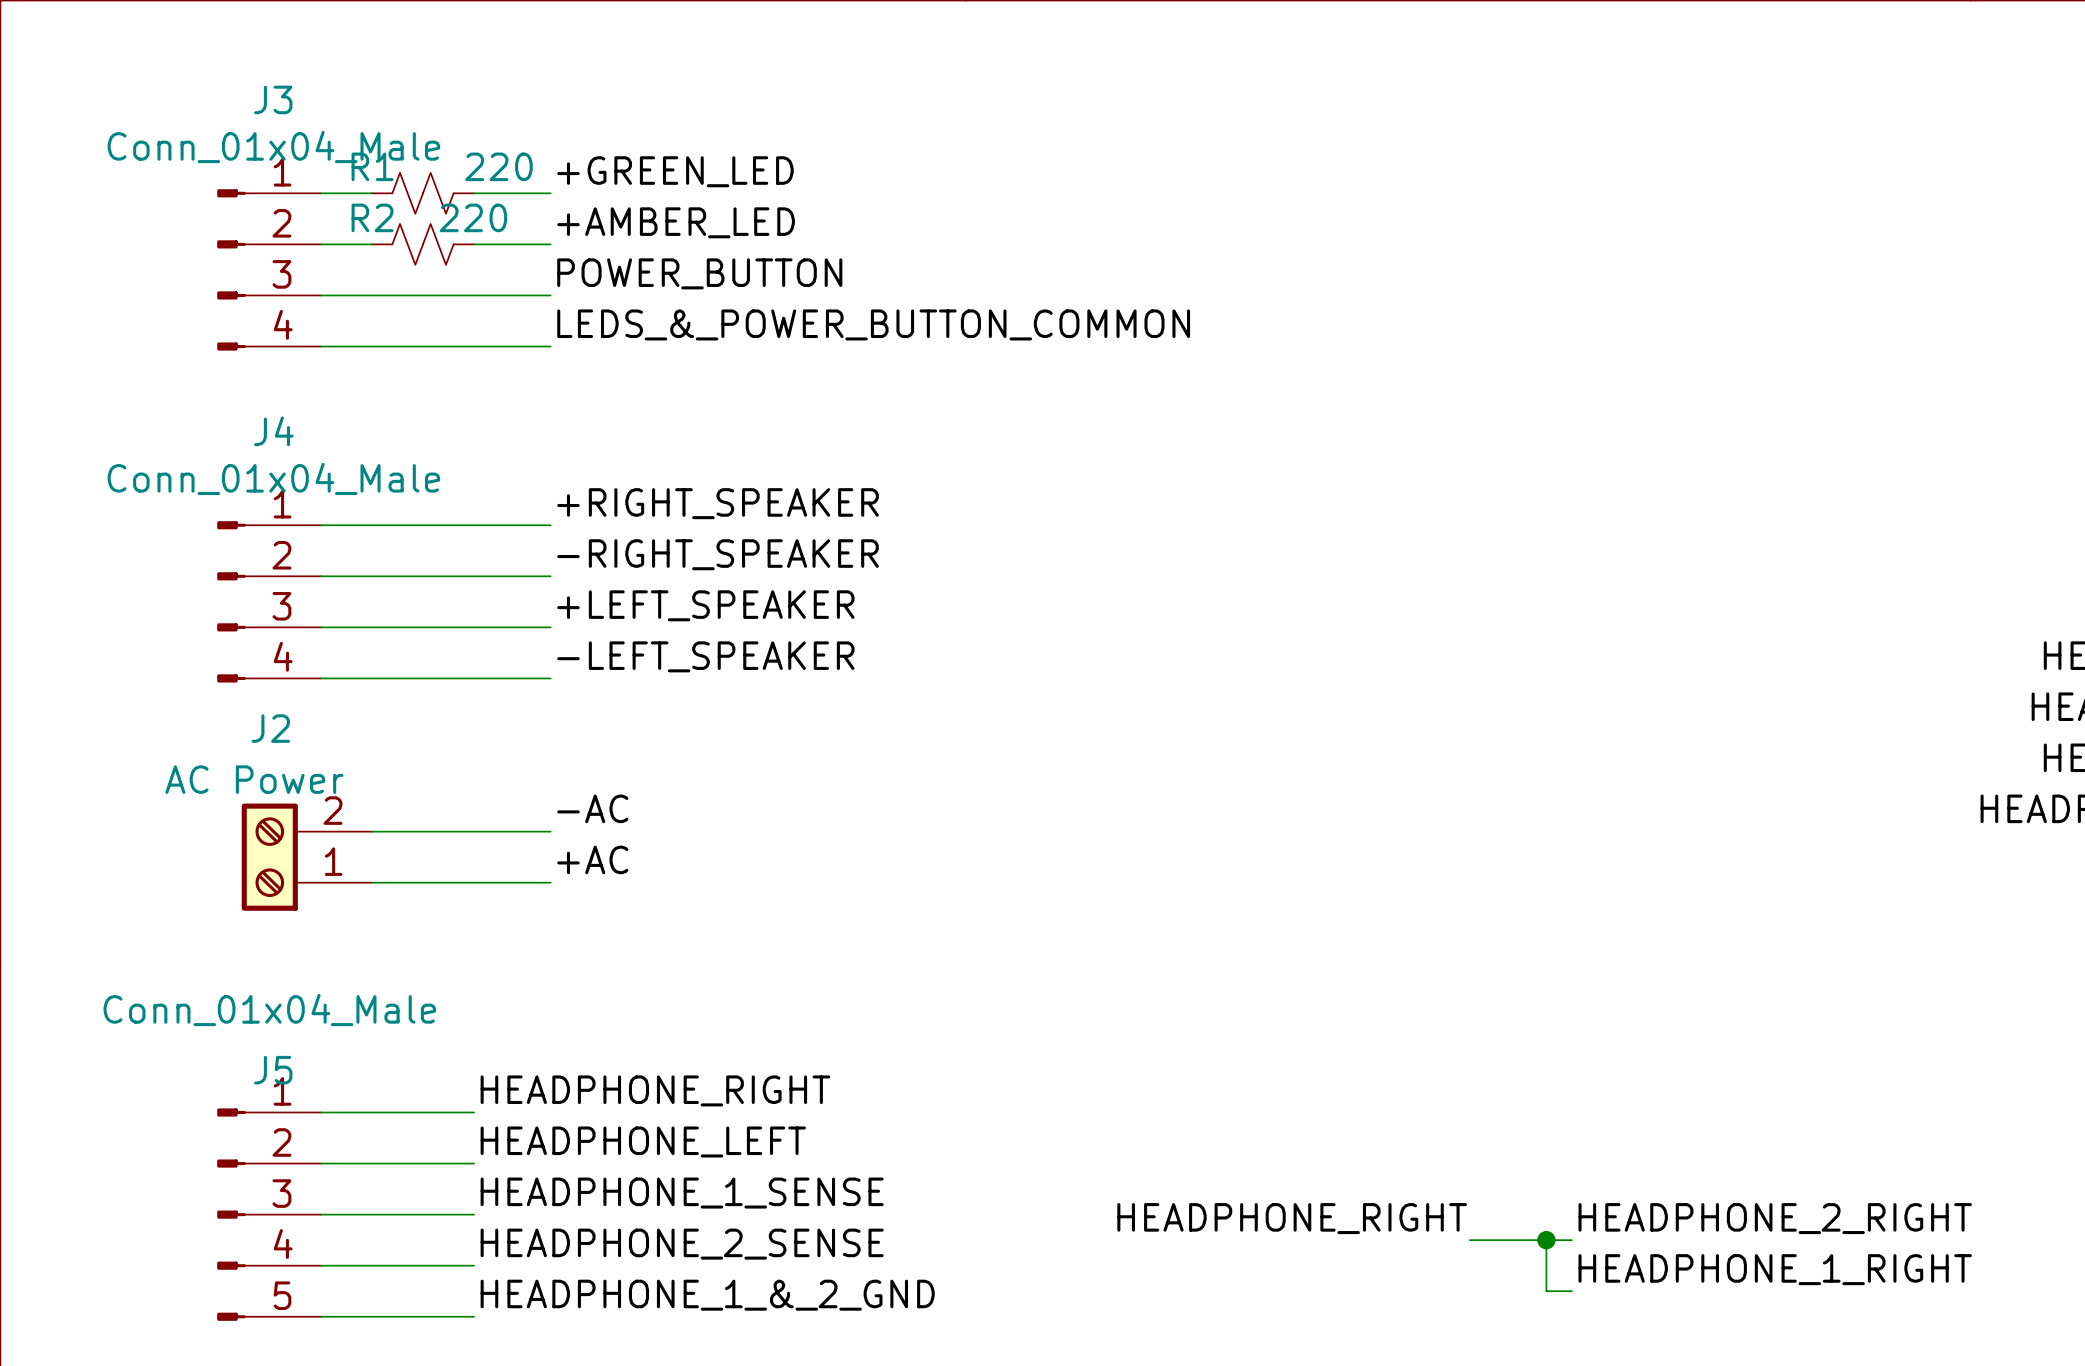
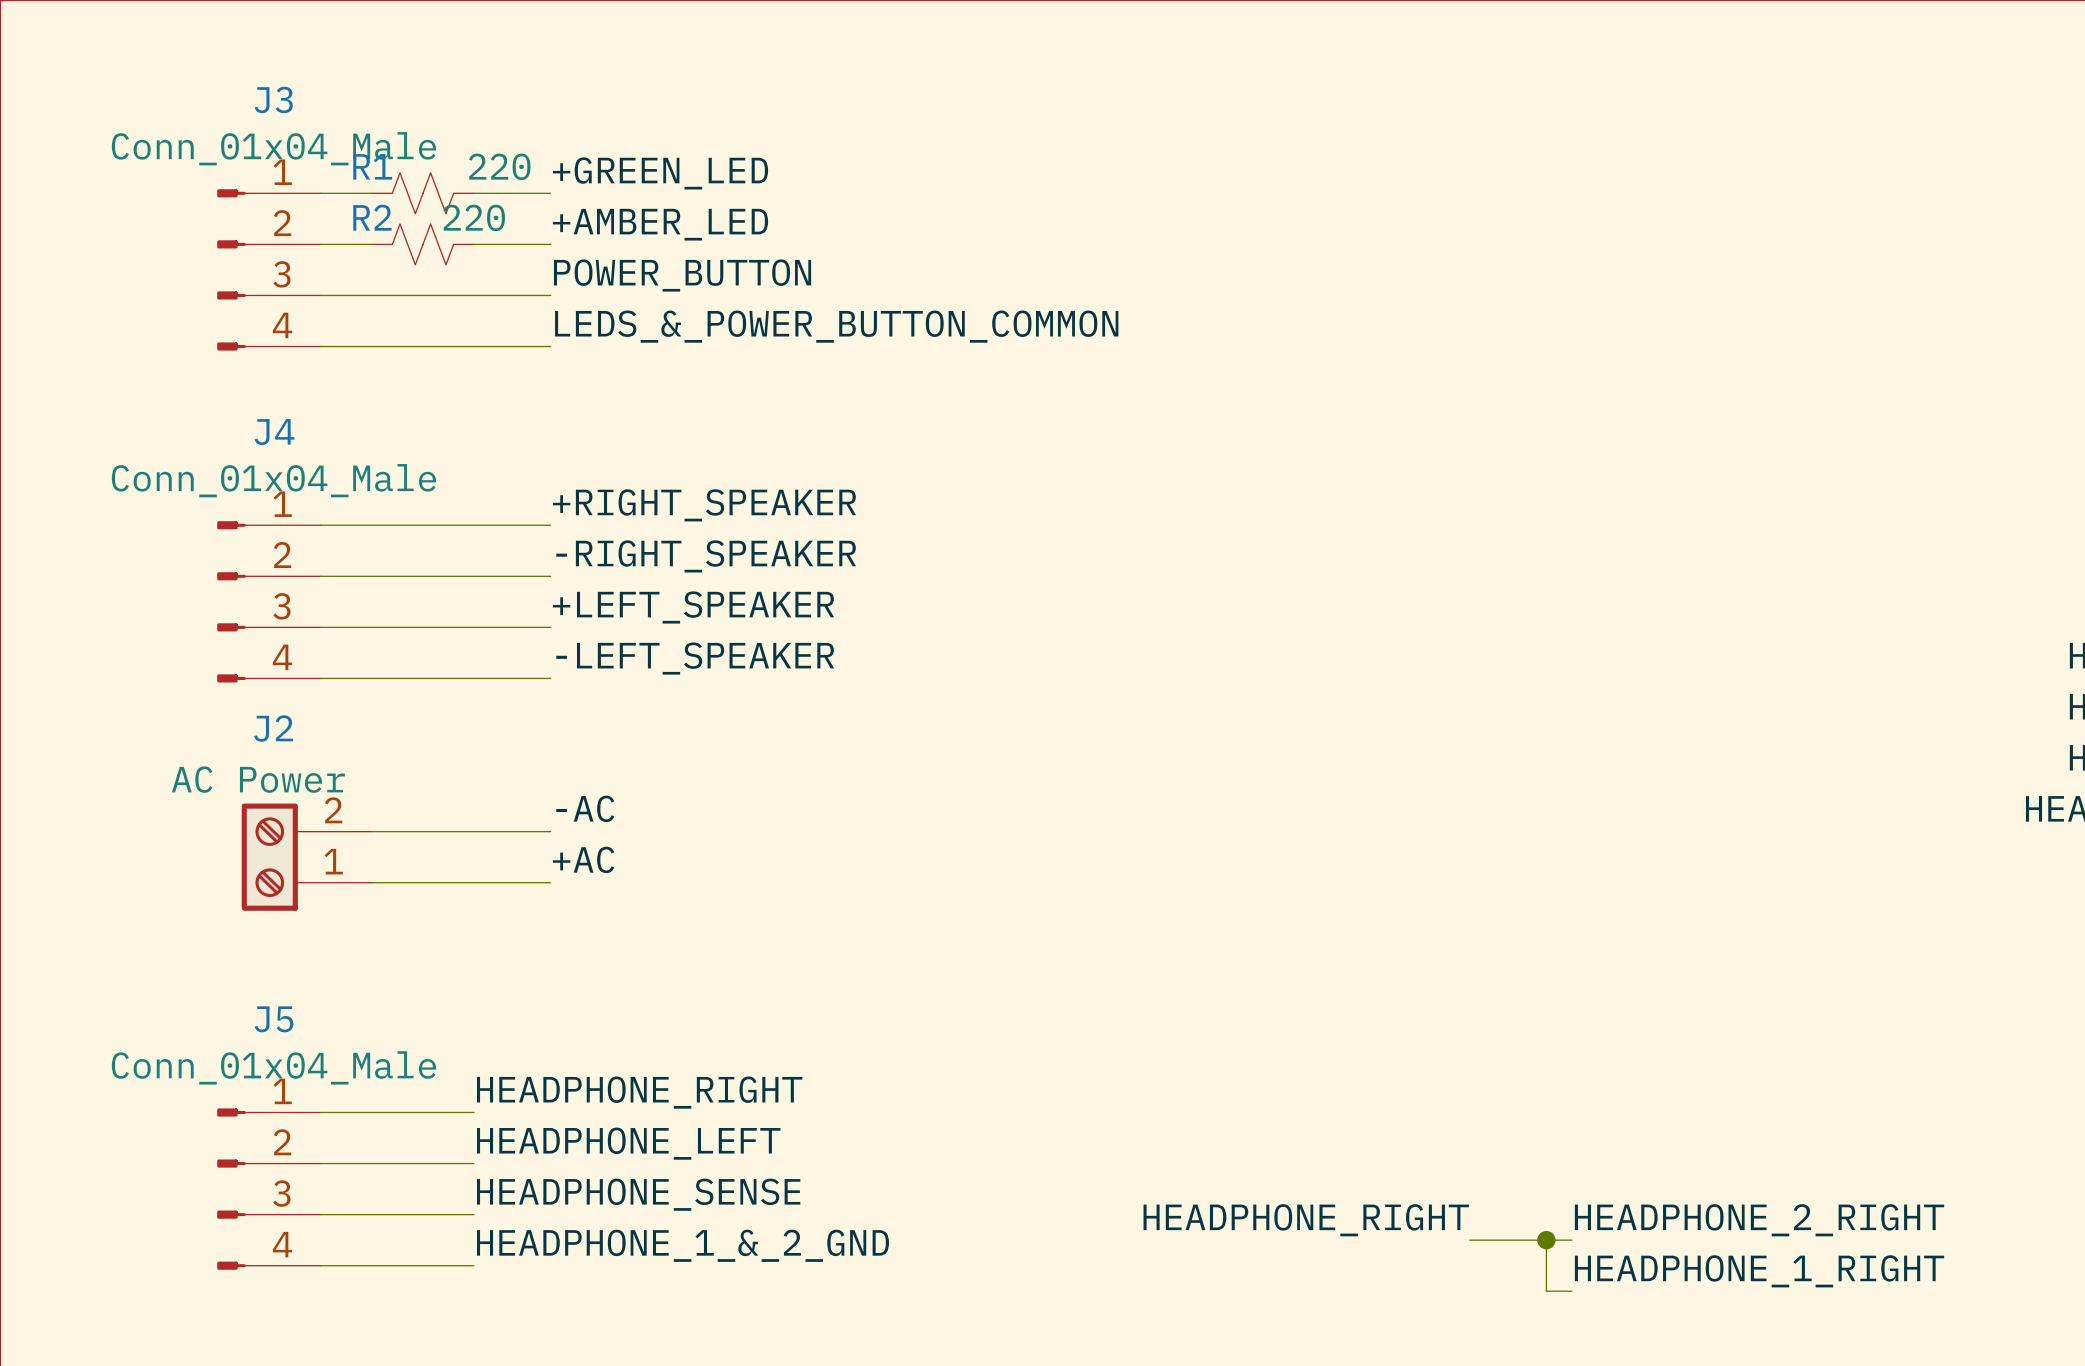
J5 value position: Conn_01x04_Male (269, 1010) -> Conn_01x04_Male (273, 1067)
J5 symbol: [217, 1108, 321, 1321] -> [217, 1108, 321, 1270]
label: HEADPHONE_1_SENSE (682, 1193) -> HEADPHONE_SENSE (638, 1194)
label: HEADPHONE_2_SENSE (682, 1244) -> HEADPHONE_1_&_2_GND (683, 1245)
label: HEADPHONE_1_&_2_GND (707, 1295) -> none
wire: (320, 1316) (474, 1316) -> none

